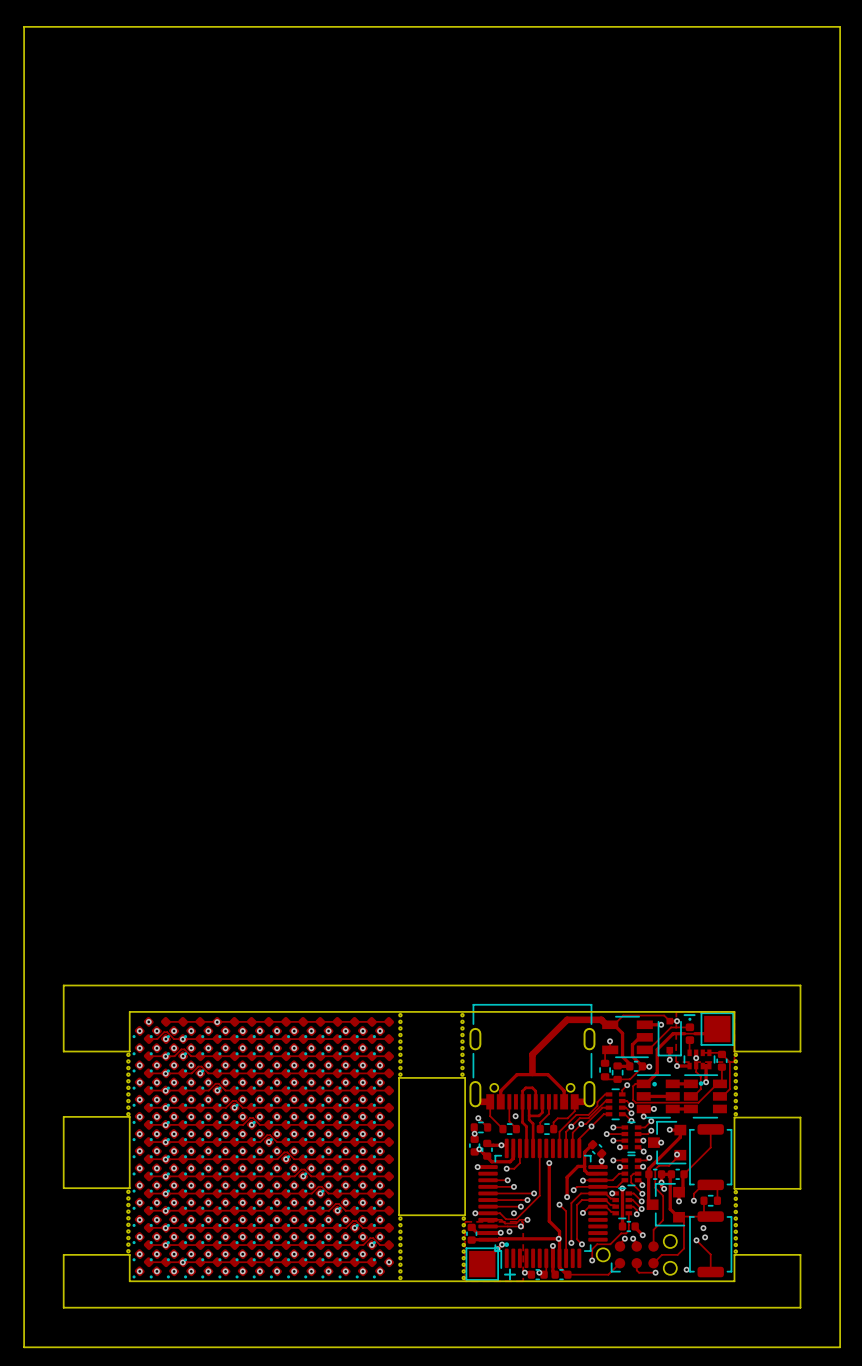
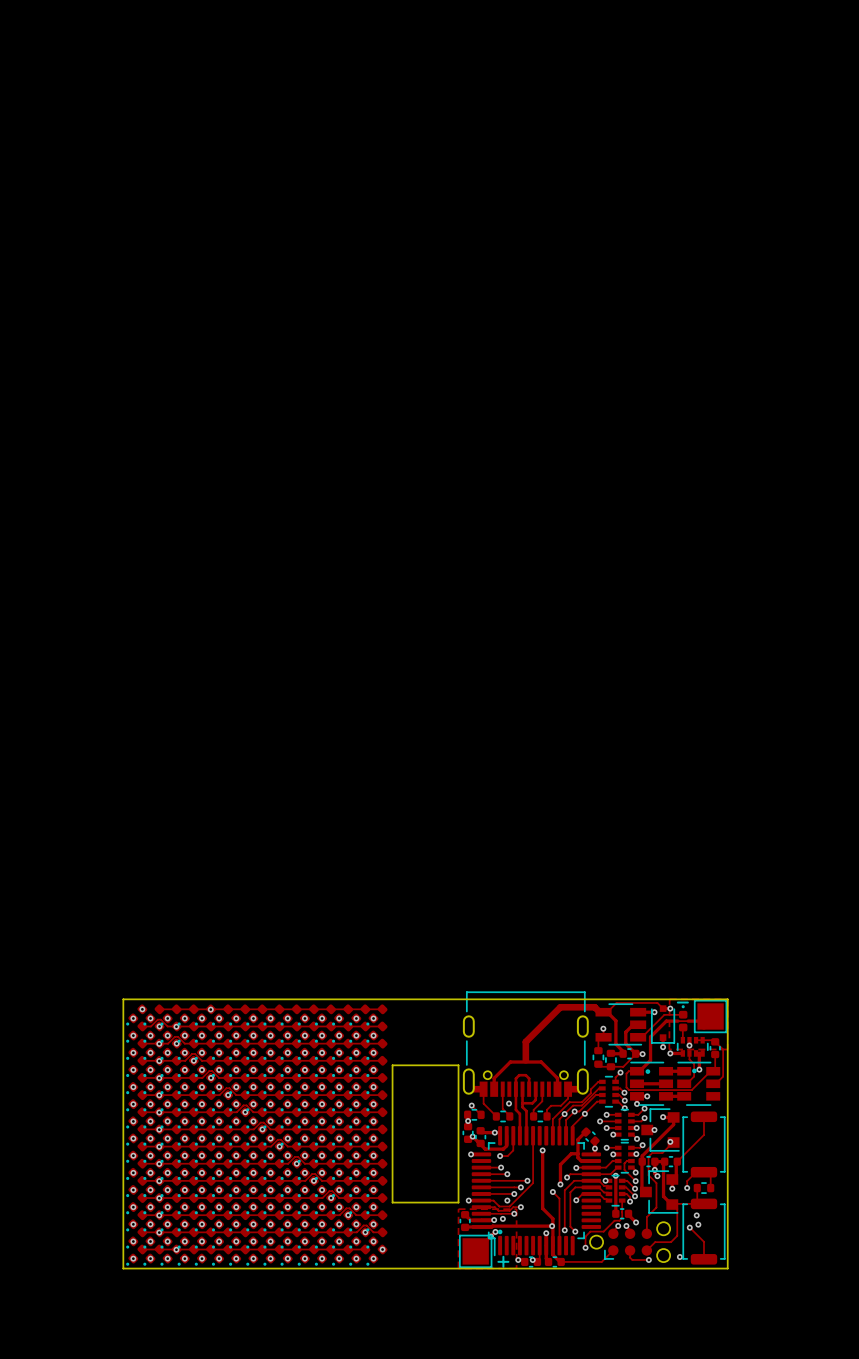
board edge: (24, 26) (24, 1347) (840, 1347) (840, 26) (24, 26) -> none
part: (400, 1015) -> none
part: (462, 1015) -> none
part: (400, 1021) -> none
part: (462, 1021) -> none
part: (400, 1028) -> none
part: (462, 1028) -> none
part: (400, 1035) -> none
part: (462, 1035) -> none
part: (400, 1041) -> none
part: (462, 1041) -> none
part: (400, 1048) -> none
part: (462, 1048) -> none
board edge: (129, 1051) (63, 1051) (63, 985) (800, 985) (800, 1051) (734, 1051) -> none
part: (128, 1054) -> none
part: (400, 1054) -> none
part: (462, 1054) -> none
part: (735, 1054) -> none
part: (128, 1061) -> none
part: (400, 1061) -> none
part: (462, 1061) -> none
part: (735, 1061) -> none
part: (128, 1068) -> none
part: (400, 1068) -> none
part: (462, 1068) -> none
part: (735, 1068) -> none
part: (128, 1074) -> none
part: (400, 1074) -> none
part: (462, 1074) -> none
part: (735, 1074) -> none
part: (128, 1081) -> none
part: (735, 1081) -> none
part: (128, 1087) -> none
part: (735, 1087) -> none
part: (128, 1094) -> none
part: (735, 1094) -> none
part: (128, 1101) -> none
part: (735, 1101) -> none
part: (128, 1107) -> none
part: (735, 1107) -> none
part: (128, 1114) -> none
part: (735, 1114) -> none
board edge: (129, 1116) (63, 1116) (63, 1188) (129, 1188) -> (123, 1104) (123, 1038)
board edge: (734, 1117) (800, 1117) (800, 1188) (734, 1188) -> (727, 1104) (727, 1038)
board edge: none -> (123, 1175) (123, 1242)
part: (128, 1191) -> none
part: (735, 1192) -> none
part: (128, 1198) -> none
part: (735, 1198) -> none
part: (128, 1205) -> none
part: (735, 1205) -> none
part: (128, 1211) -> none
part: (735, 1211) -> none
part: (128, 1218) -> none
part: (400, 1218) -> none
part: (463, 1218) -> none
part: (735, 1218) -> none
part: (128, 1224) -> none
part: (400, 1225) -> none
part: (463, 1225) -> none
part: (735, 1225) -> none
part: (128, 1231) -> none
part: (400, 1231) -> none
part: (463, 1231) -> none
part: (735, 1231) -> none
part: (128, 1238) -> none
part: (400, 1238) -> none
part: (463, 1238) -> none
part: (735, 1238) -> none
part: (128, 1244) -> none
part: (400, 1244) -> none
part: (463, 1244) -> none
part: (735, 1244) -> none
part: (128, 1251) -> none
part: (400, 1251) -> none
part: (463, 1251) -> none
part: (735, 1251) -> none
board edge: (129, 1254) (63, 1254) (63, 1307) (800, 1307) (800, 1254) (734, 1254) -> (727, 1176) (727, 1242)
part: (400, 1258) -> none
part: (463, 1258) -> none
part: (400, 1264) -> none
part: (463, 1264) -> none
part: (400, 1271) -> none
part: (463, 1271) -> none
part: (400, 1277) -> none
part: (463, 1277) -> none

